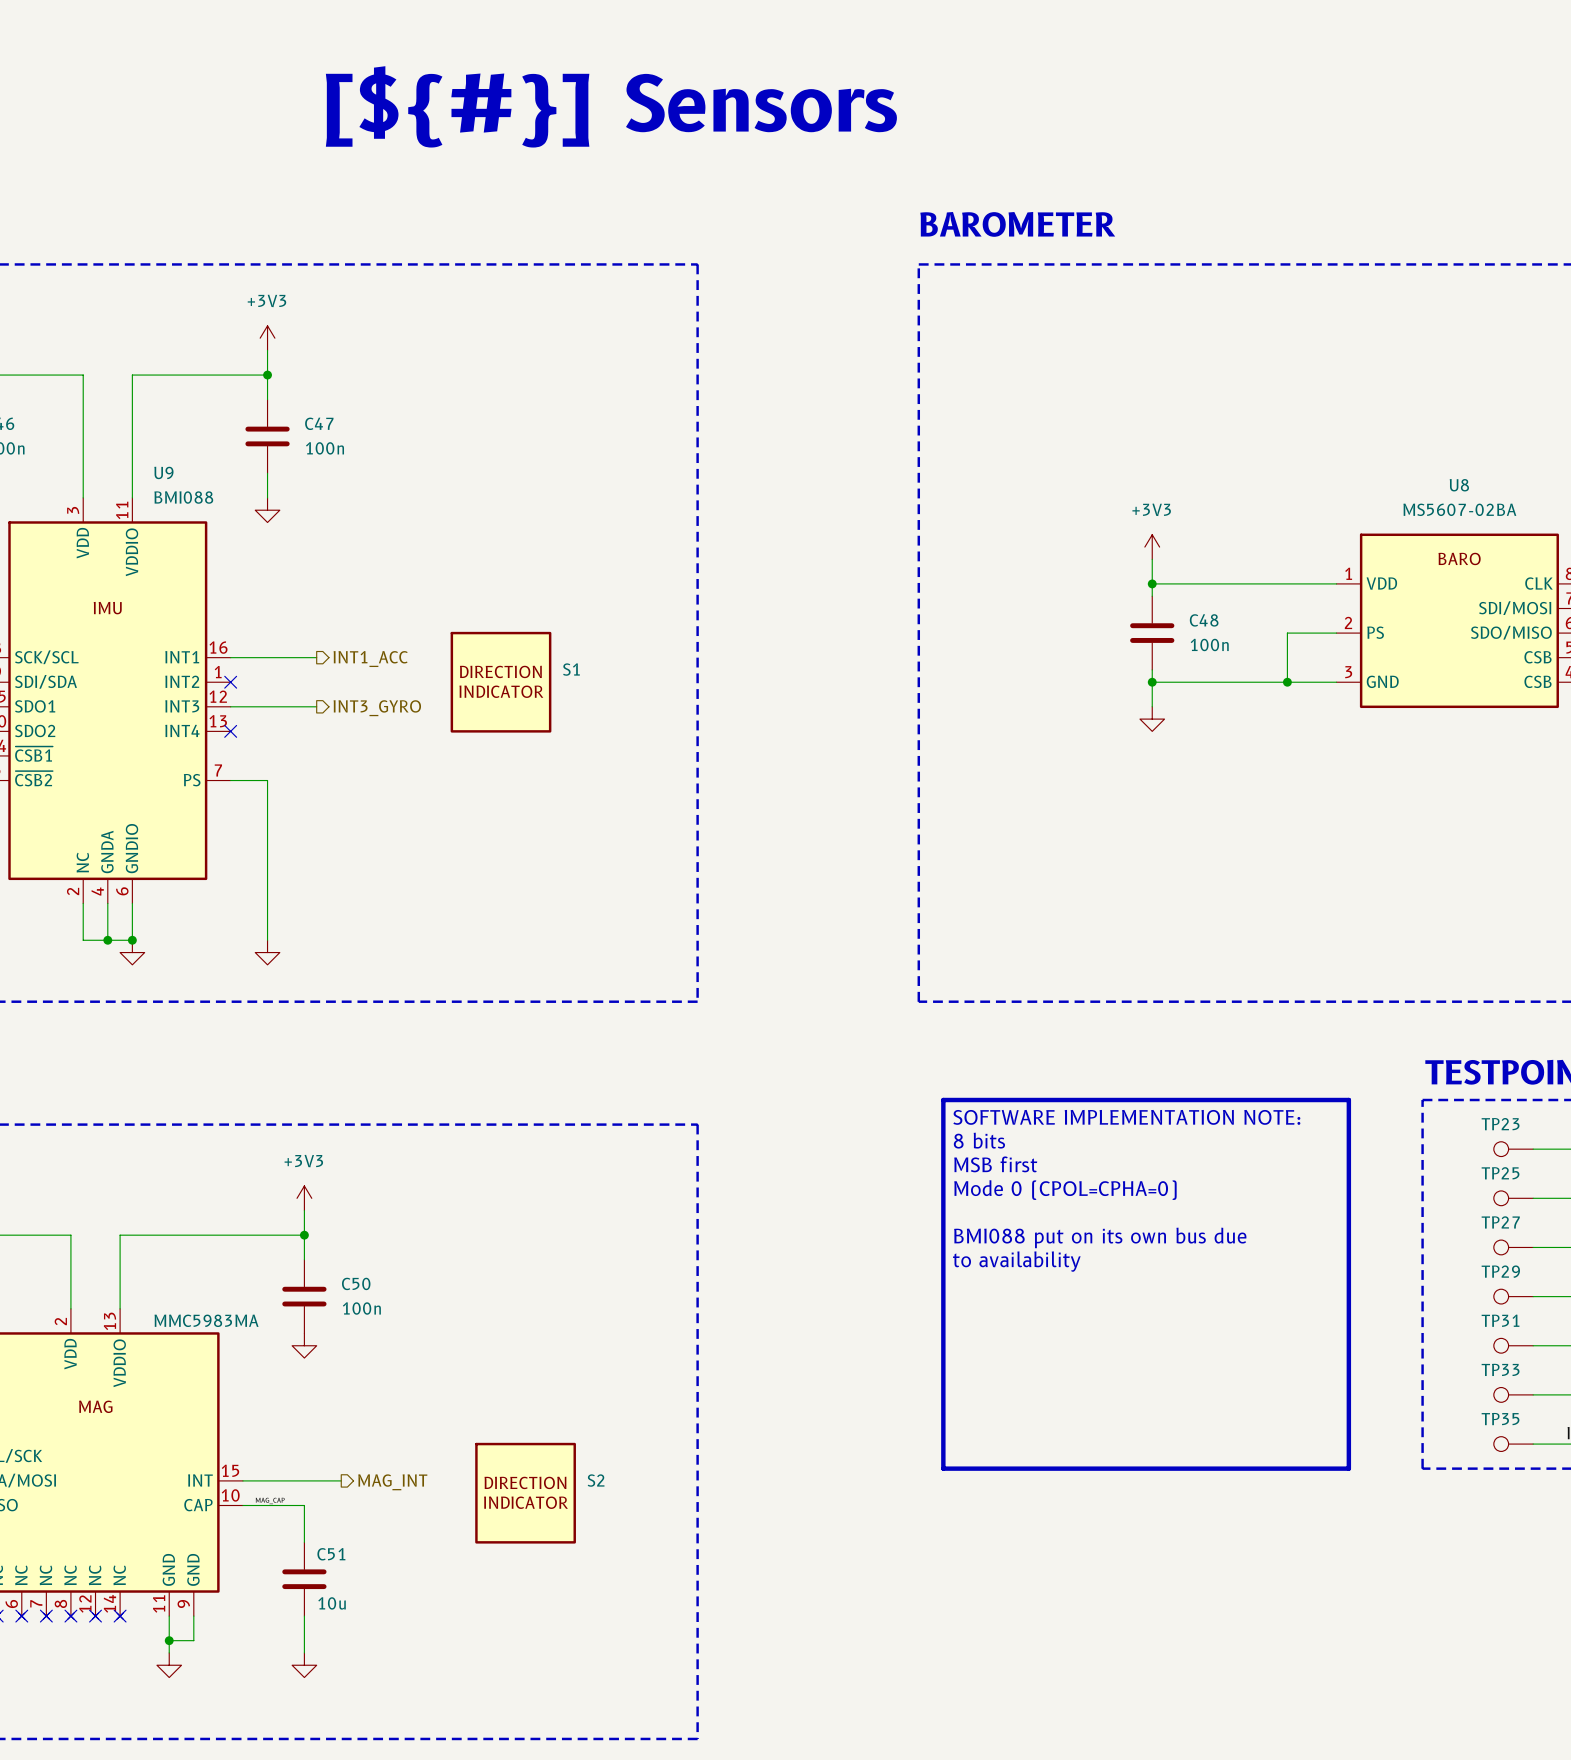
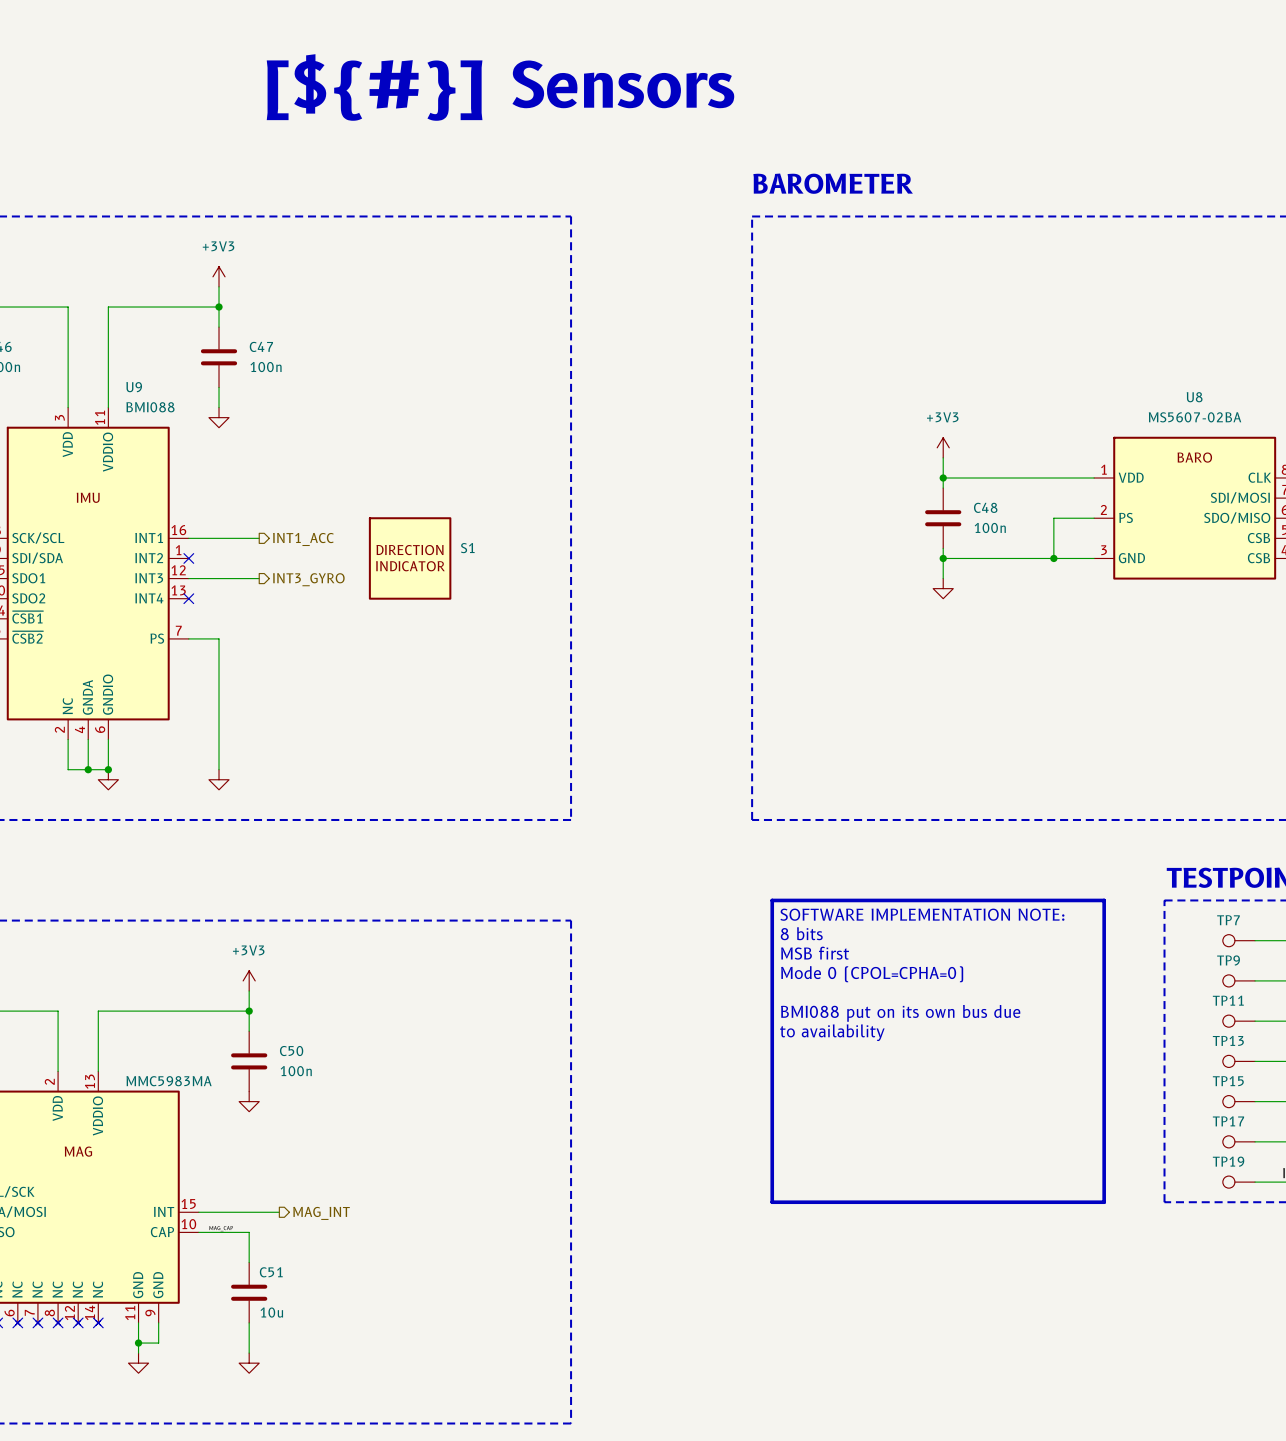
TP23 name: TP23 (1500, 1124) -> TP7 (1228, 920)
TP25 name: TP25 (1500, 1173) -> TP9 (1228, 960)
TP27 name: TP27 (1500, 1222) -> TP11 (1228, 1000)
TP29 name: TP29 (1500, 1271) -> TP13 (1228, 1040)
TP31 name: TP31 (1500, 1320) -> TP15 (1228, 1081)
TP33 name: TP33 (1500, 1369) -> TP17 (1228, 1121)
TP35 name: TP35 (1500, 1419) -> TP19 (1228, 1161)
S2: (525, 1493) -> none

